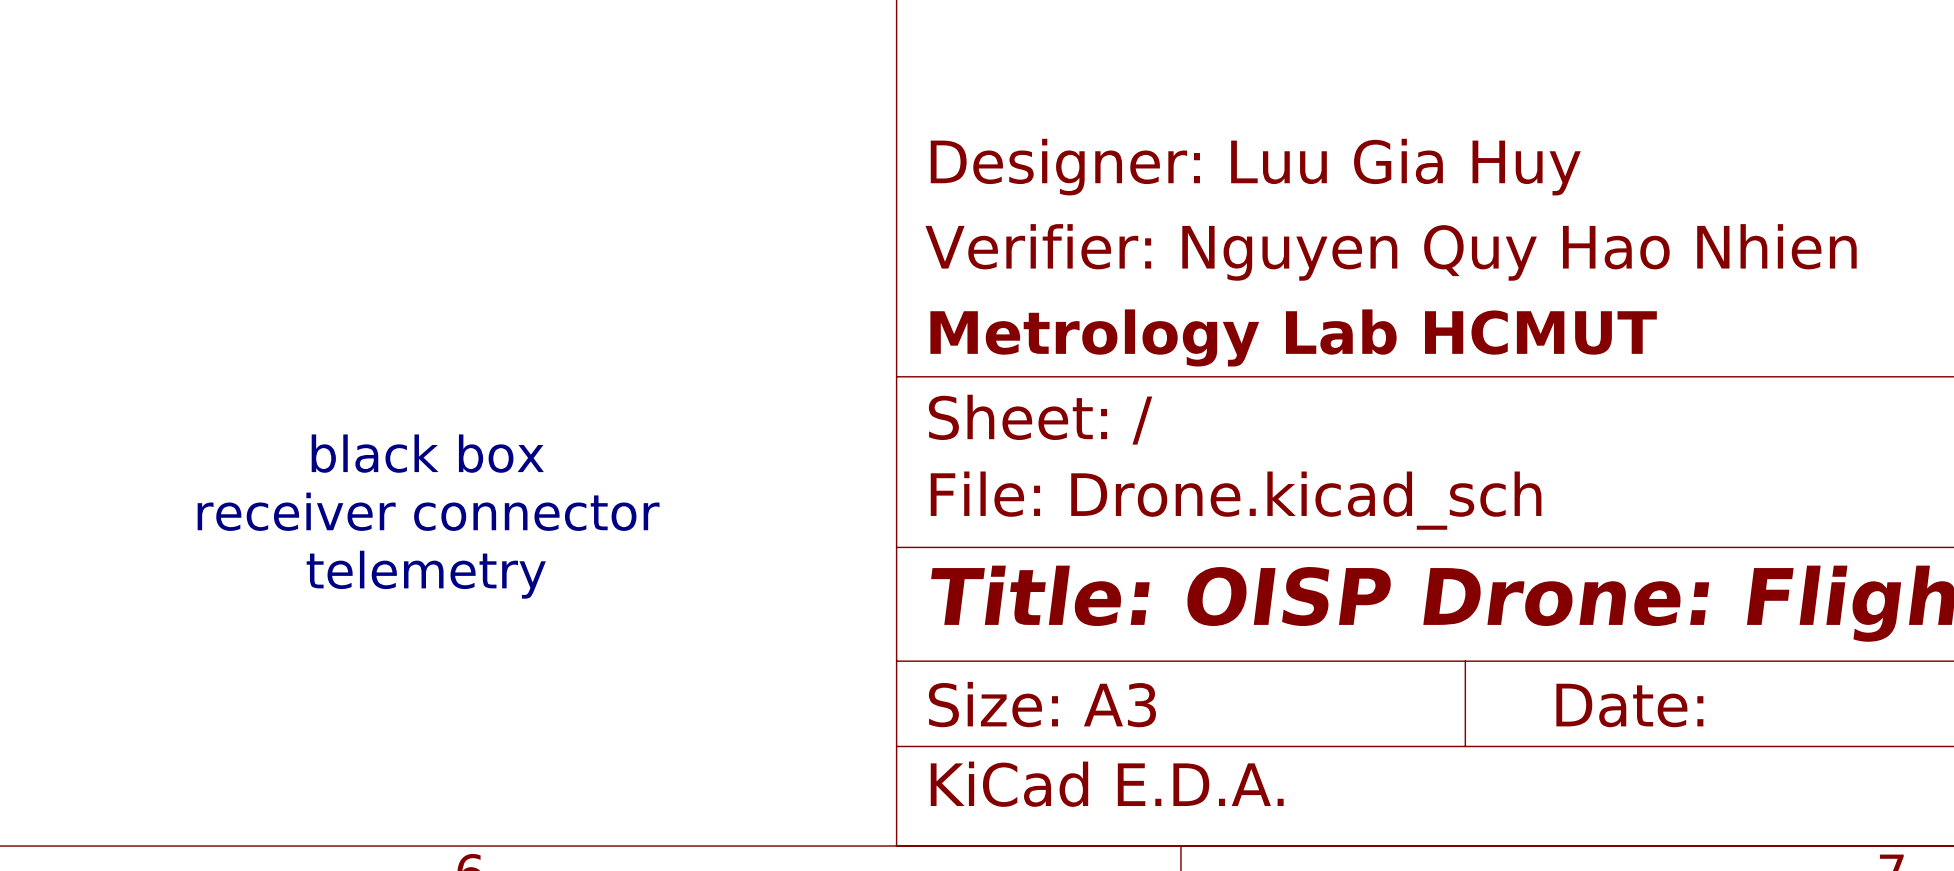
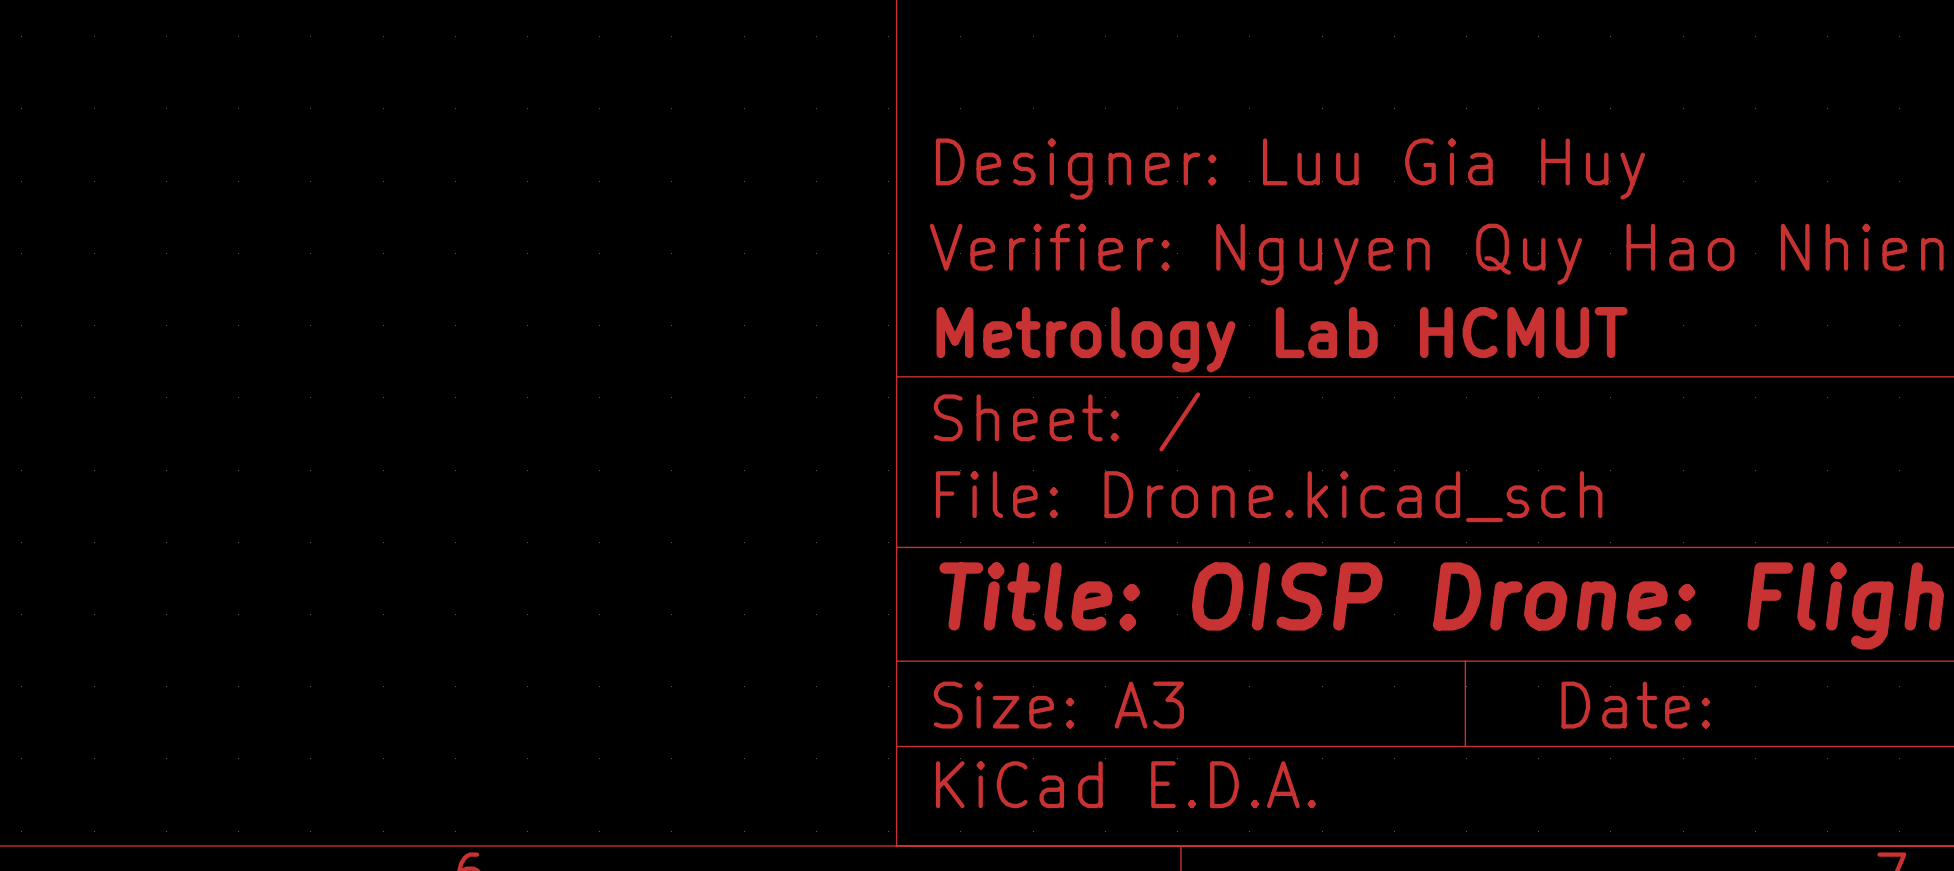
text: black box (427, 453) -> none
text: receiver connector (428, 511) -> none
text: telemetry (426, 574) -> none

